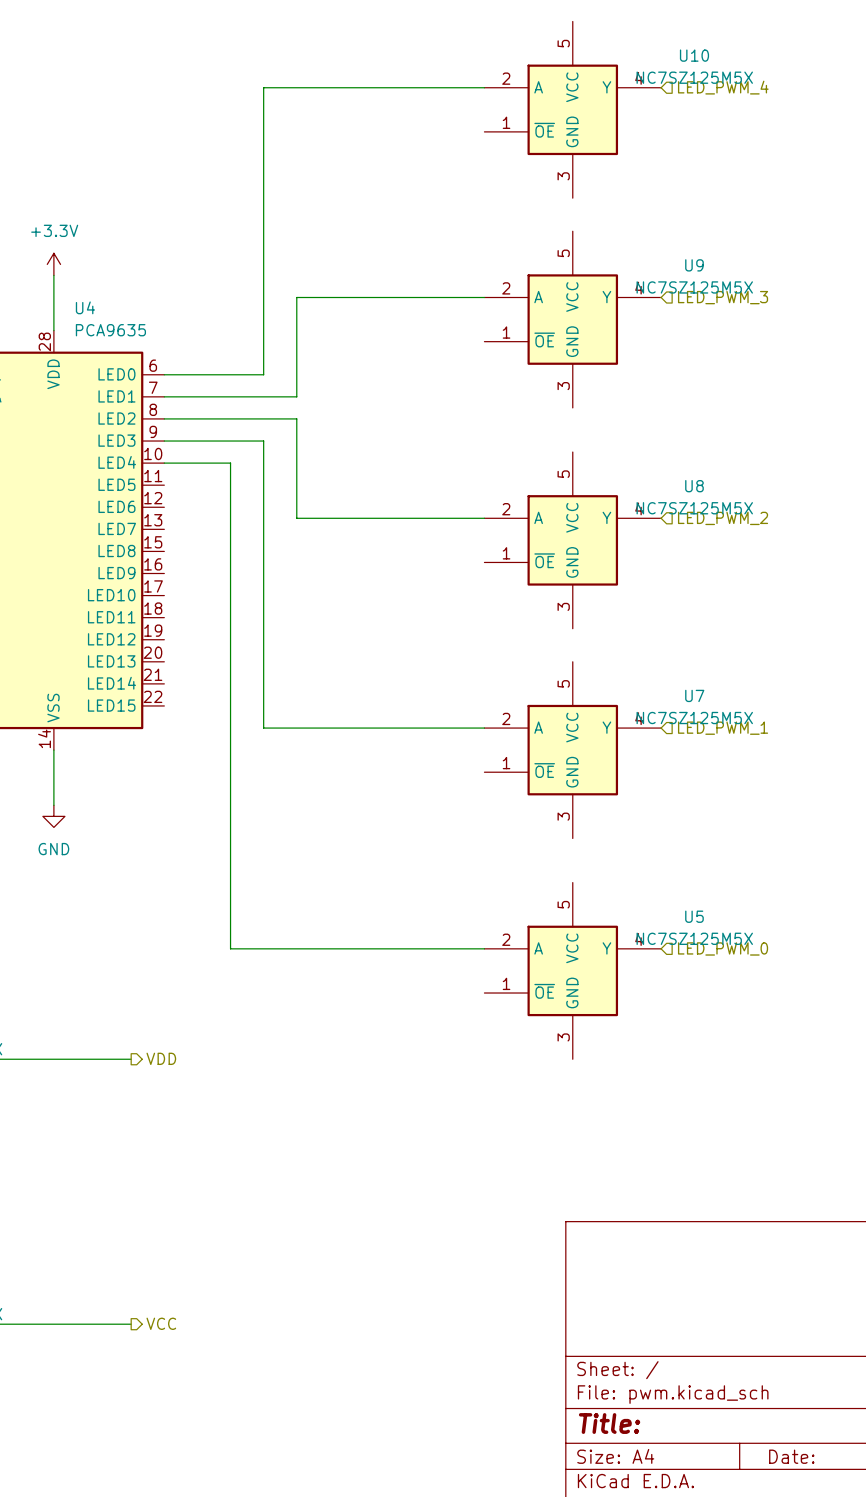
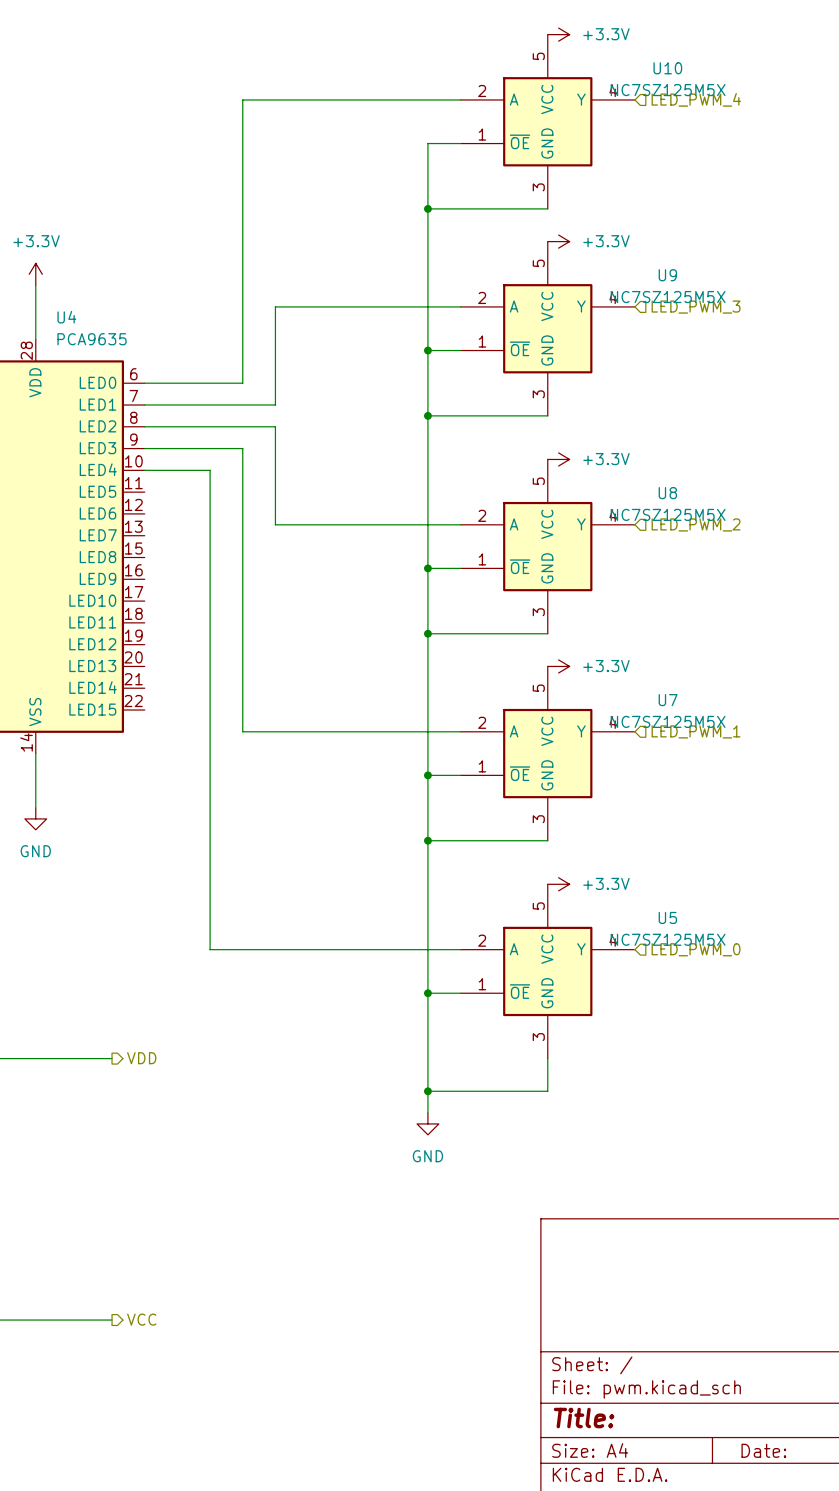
power symbol: none -> +3.3V (558, 34)
wire: none -> (460, 143) (427, 143) (427, 1113)
wire: none -> (427, 208) (547, 208)
junction: none -> (427, 208)
power symbol: none -> +3.3V (558, 241)
wire: none -> (427, 350) (460, 350)
junction: none -> (427, 350)
wire: none -> (427, 415) (547, 415)
junction: none -> (427, 415)
power symbol: none -> +3.3V (558, 459)
wire: none -> (427, 568) (460, 568)
junction: none -> (427, 568)
wire: none -> (427, 633) (547, 633)
junction: none -> (427, 633)
power symbol: none -> +3.3V (558, 666)
wire: none -> (427, 775) (460, 775)
junction: none -> (427, 775)
wire: none -> (427, 840) (547, 840)
junction: none -> (427, 840)
power symbol: none -> +3.3V (558, 884)
wire: none -> (427, 993) (460, 993)
junction: none -> (427, 993)
wire: none -> (547, 1058) (547, 1091) (427, 1091)
junction: none -> (427, 1091)
power symbol: none -> GND (427, 1123)

